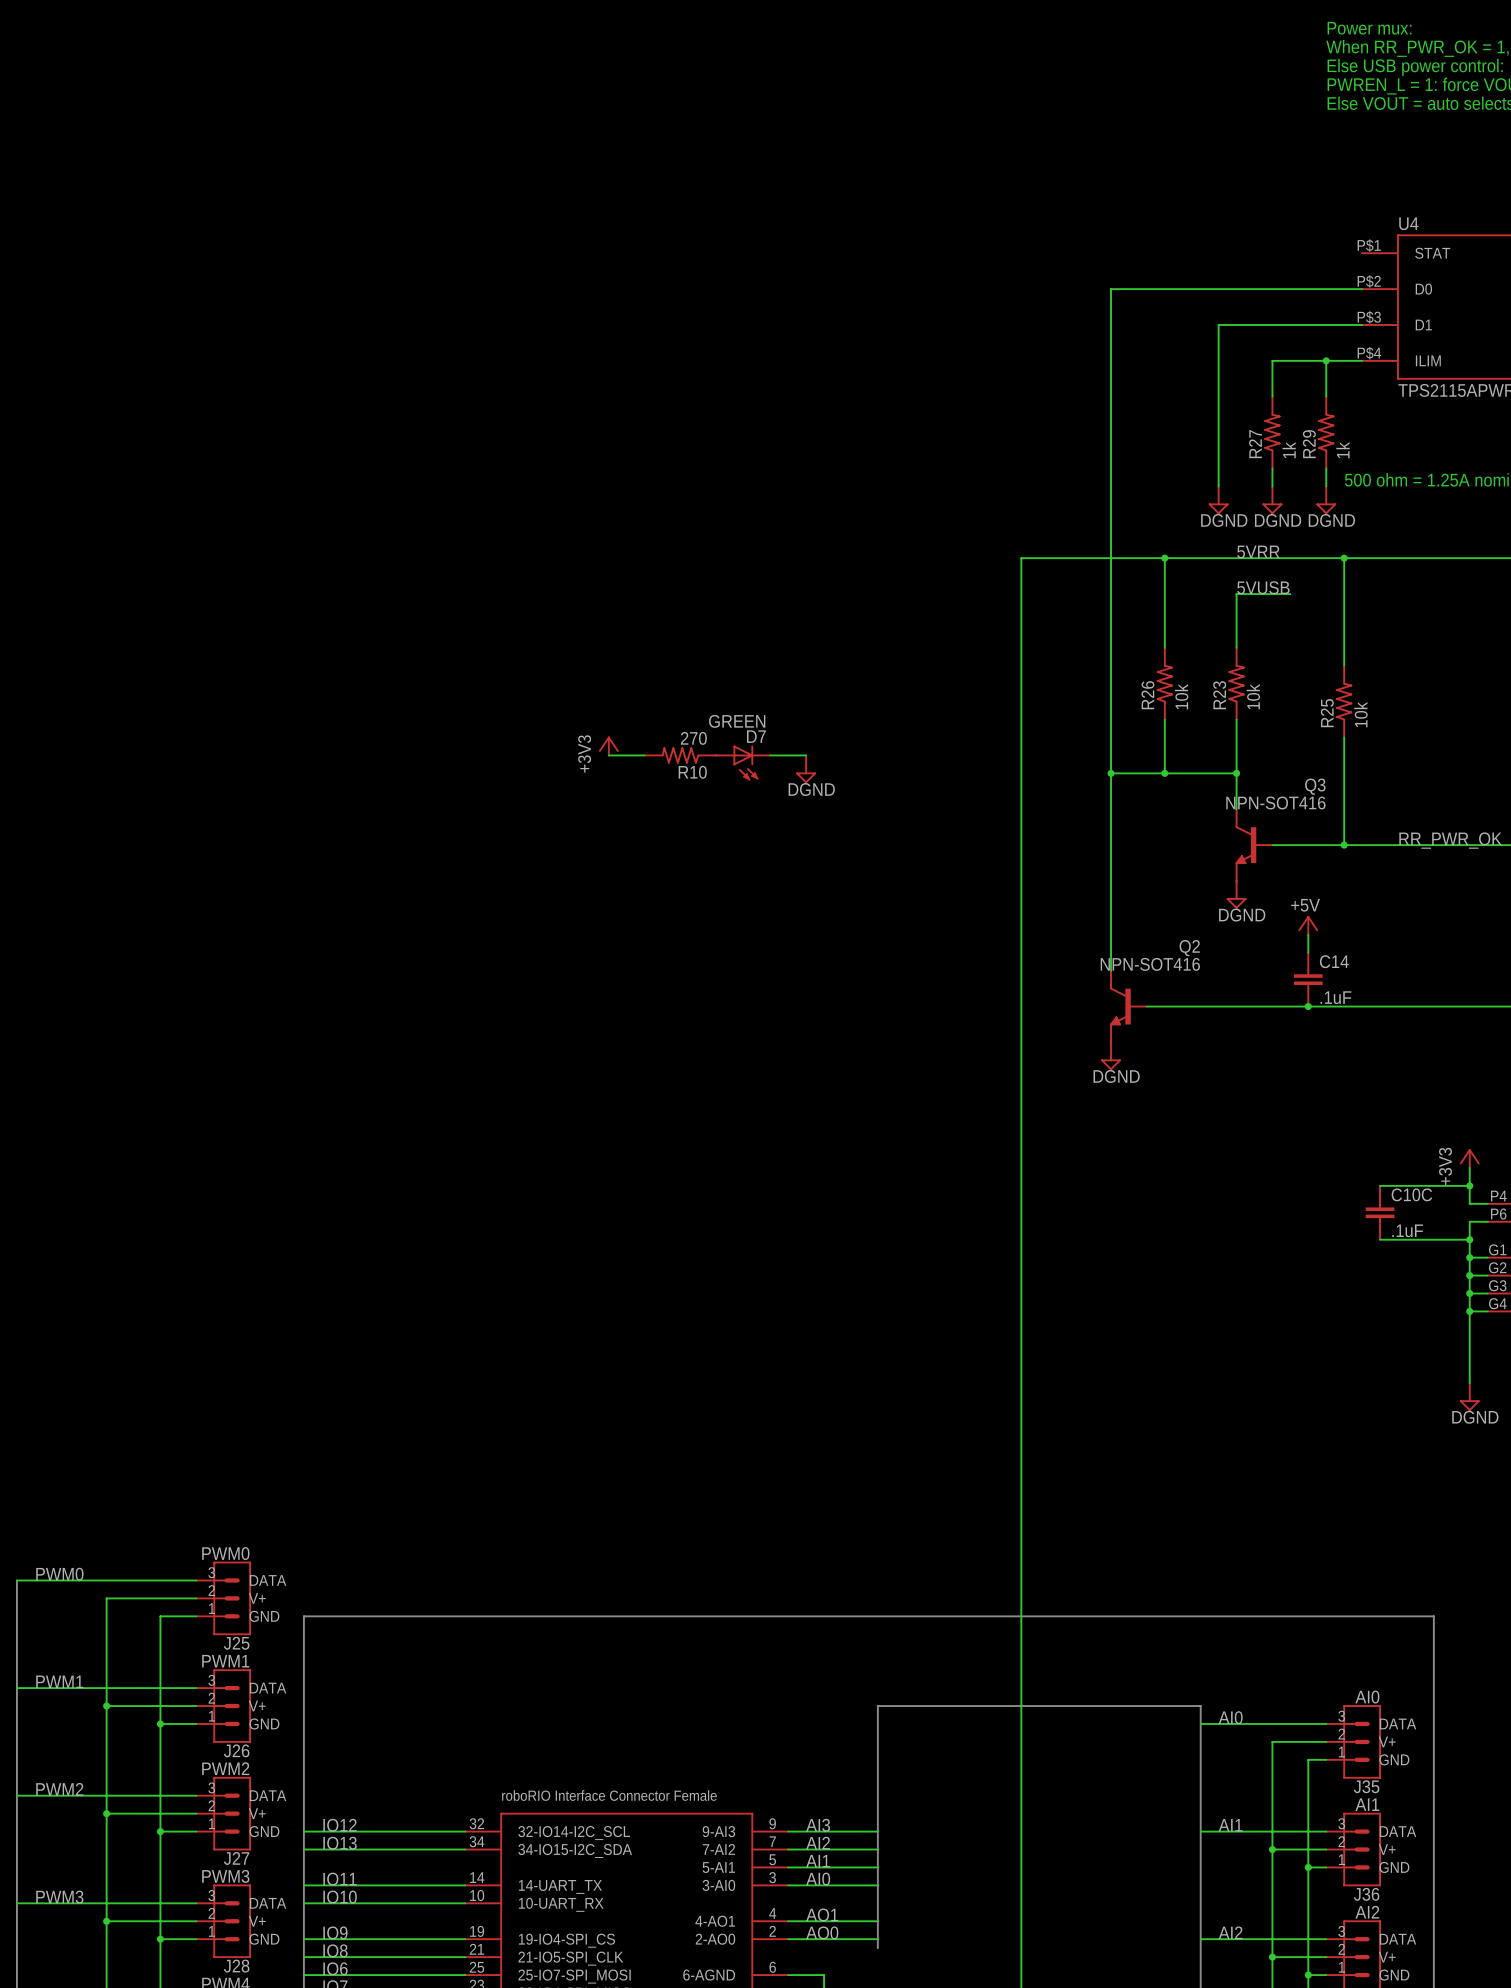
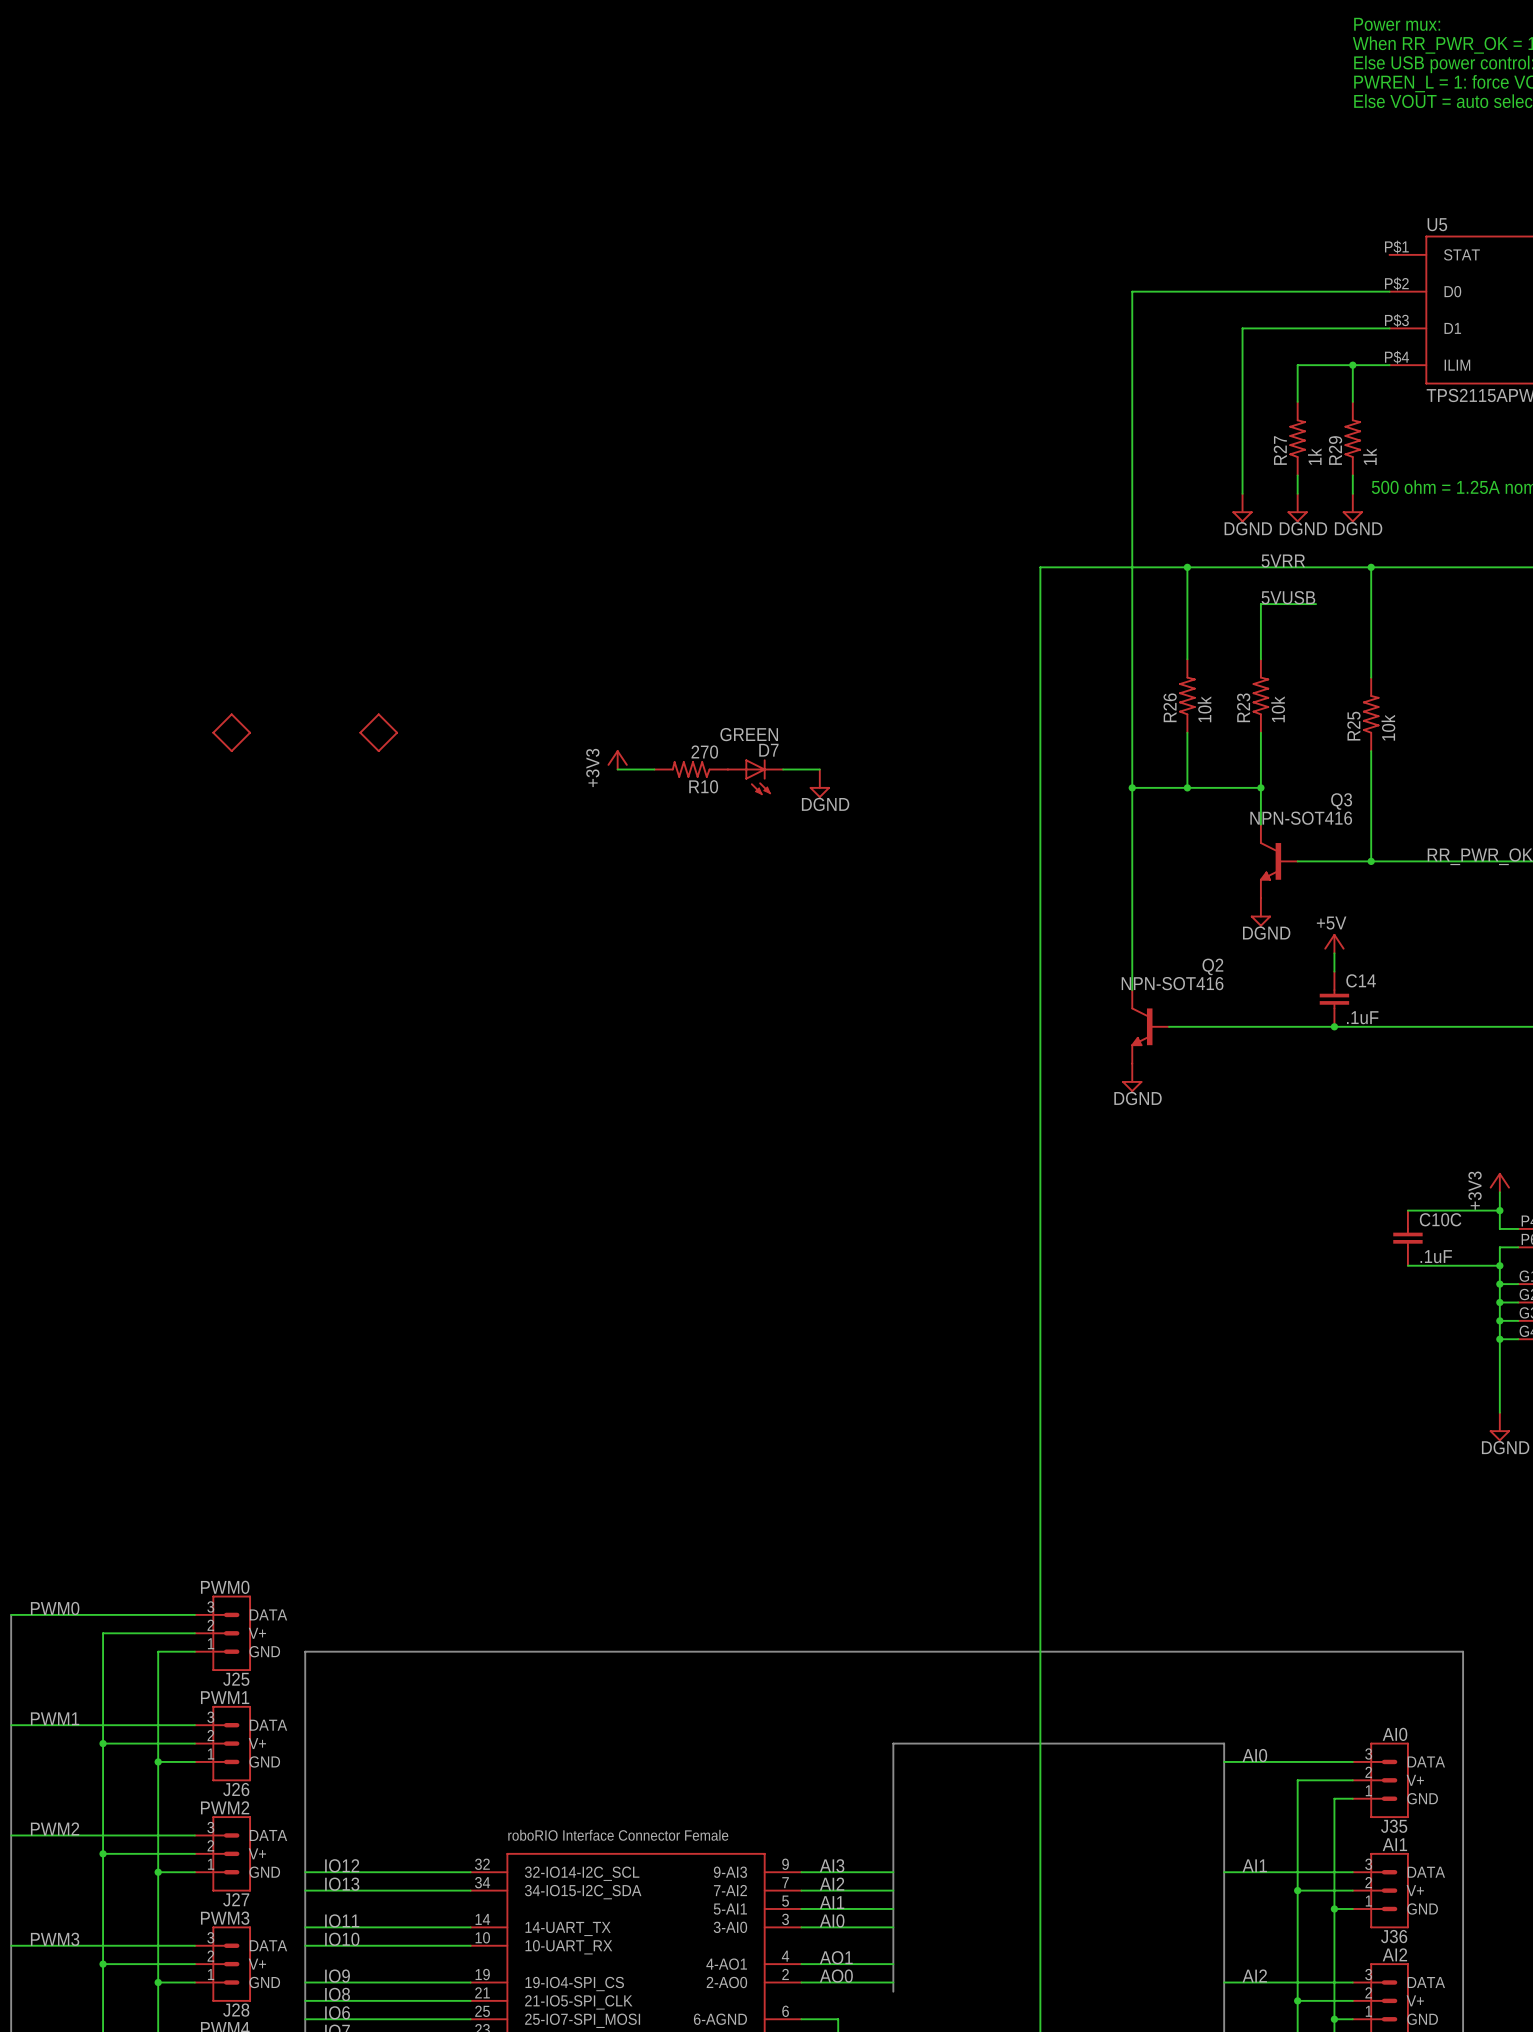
U4 name: U4 (1408, 223) -> U5 (1437, 224)
part: none -> (231, 732)
part: none -> (378, 732)

